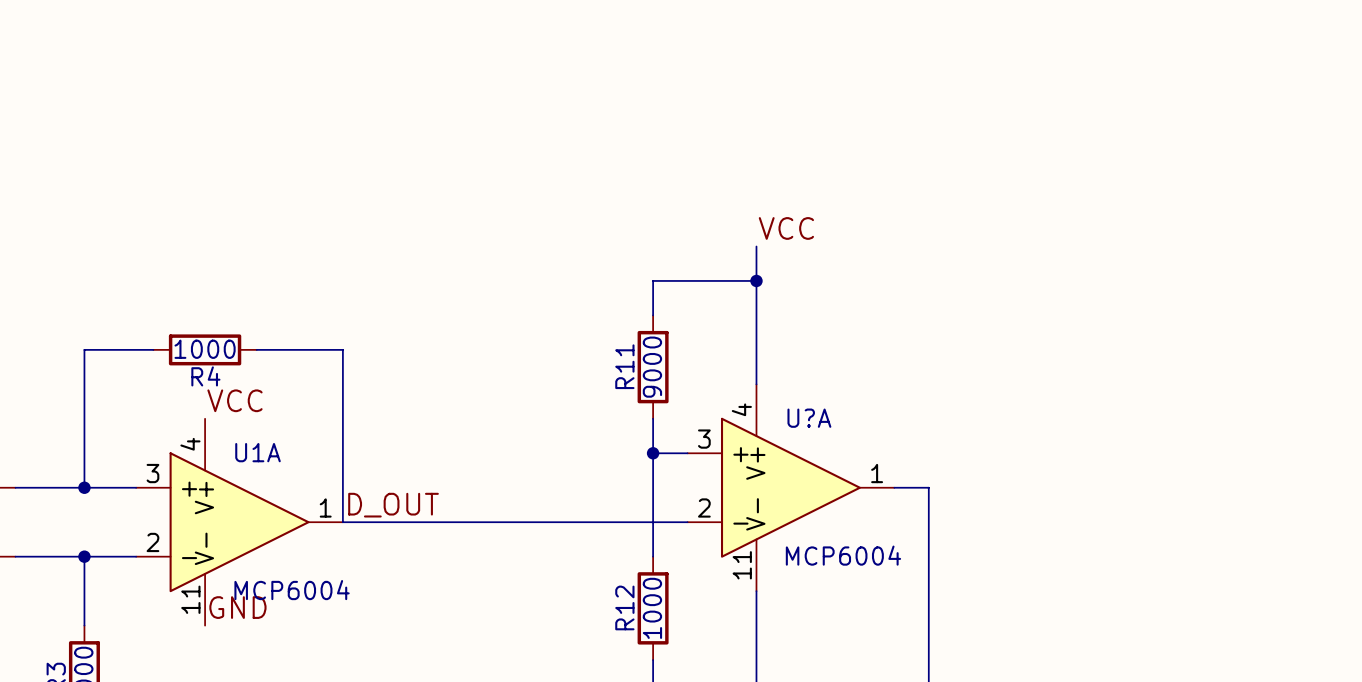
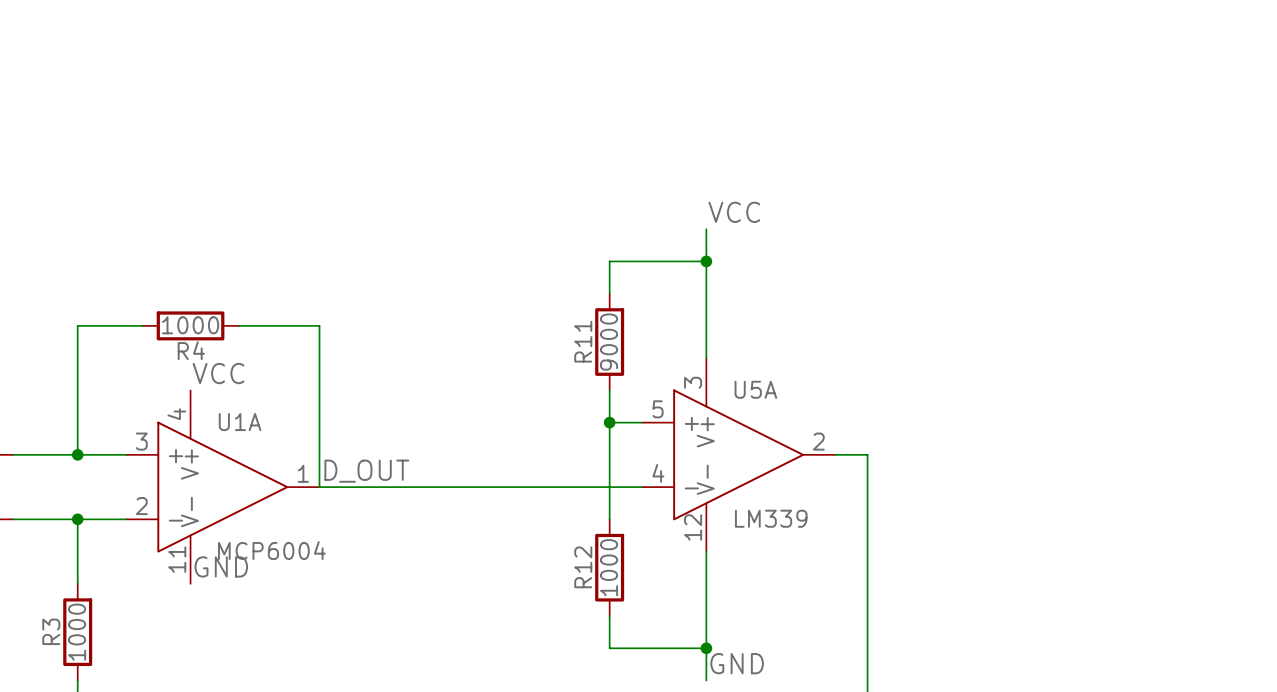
U?A pin number: 4 (741, 409) -> 3 (693, 382)
U?A name: U?A (809, 418) -> U5A (755, 389)
U?A pin number: 3 (704, 439) -> 5 (658, 409)
U?A pin number: 1 (877, 473) -> 2 (818, 441)
U?A pin number: 2 (704, 507) -> 4 (658, 473)
U?A value: MCP6004 (843, 555) -> LM339 (771, 518)
U?A pin number: 11 (742, 565) -> 12 (693, 527)

